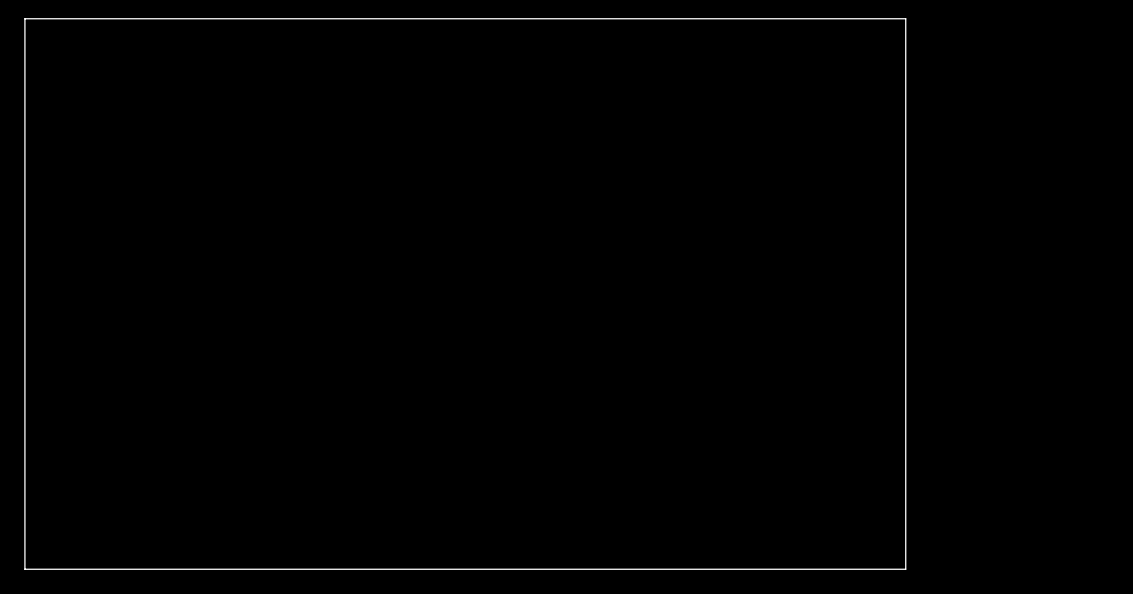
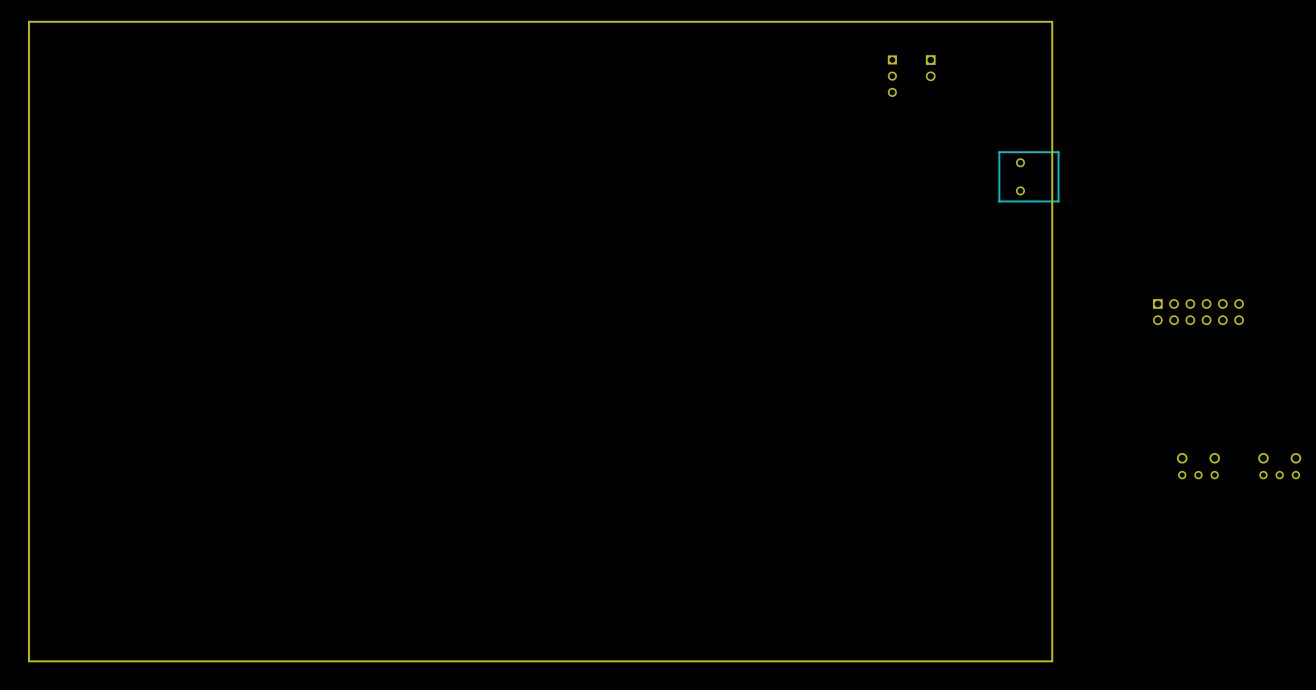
part: none -> (930, 68)
part: none -> (892, 76)
part: none -> (1028, 176)
part: none -> (1198, 312)
part: none -> (1198, 466)
part: none -> (1279, 466)

